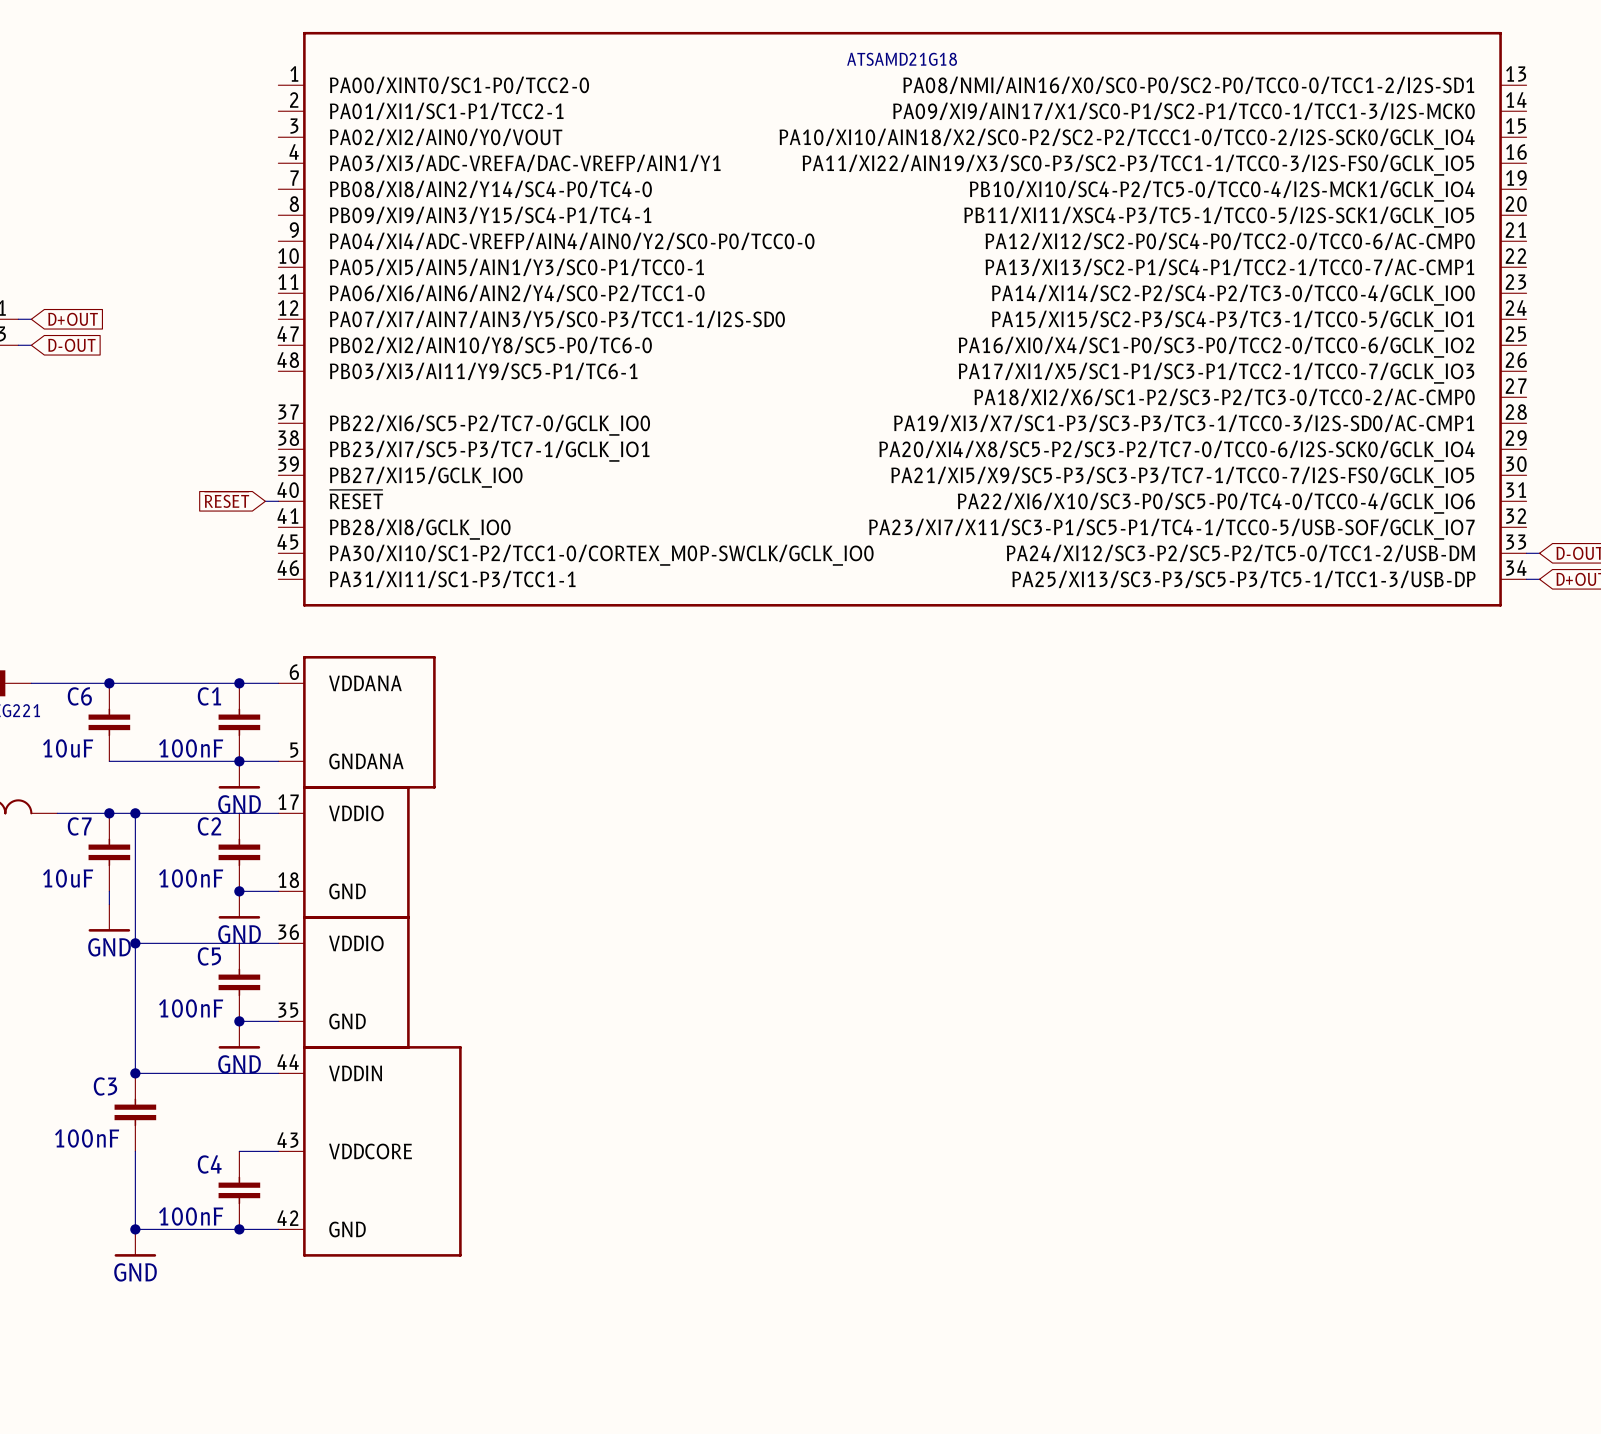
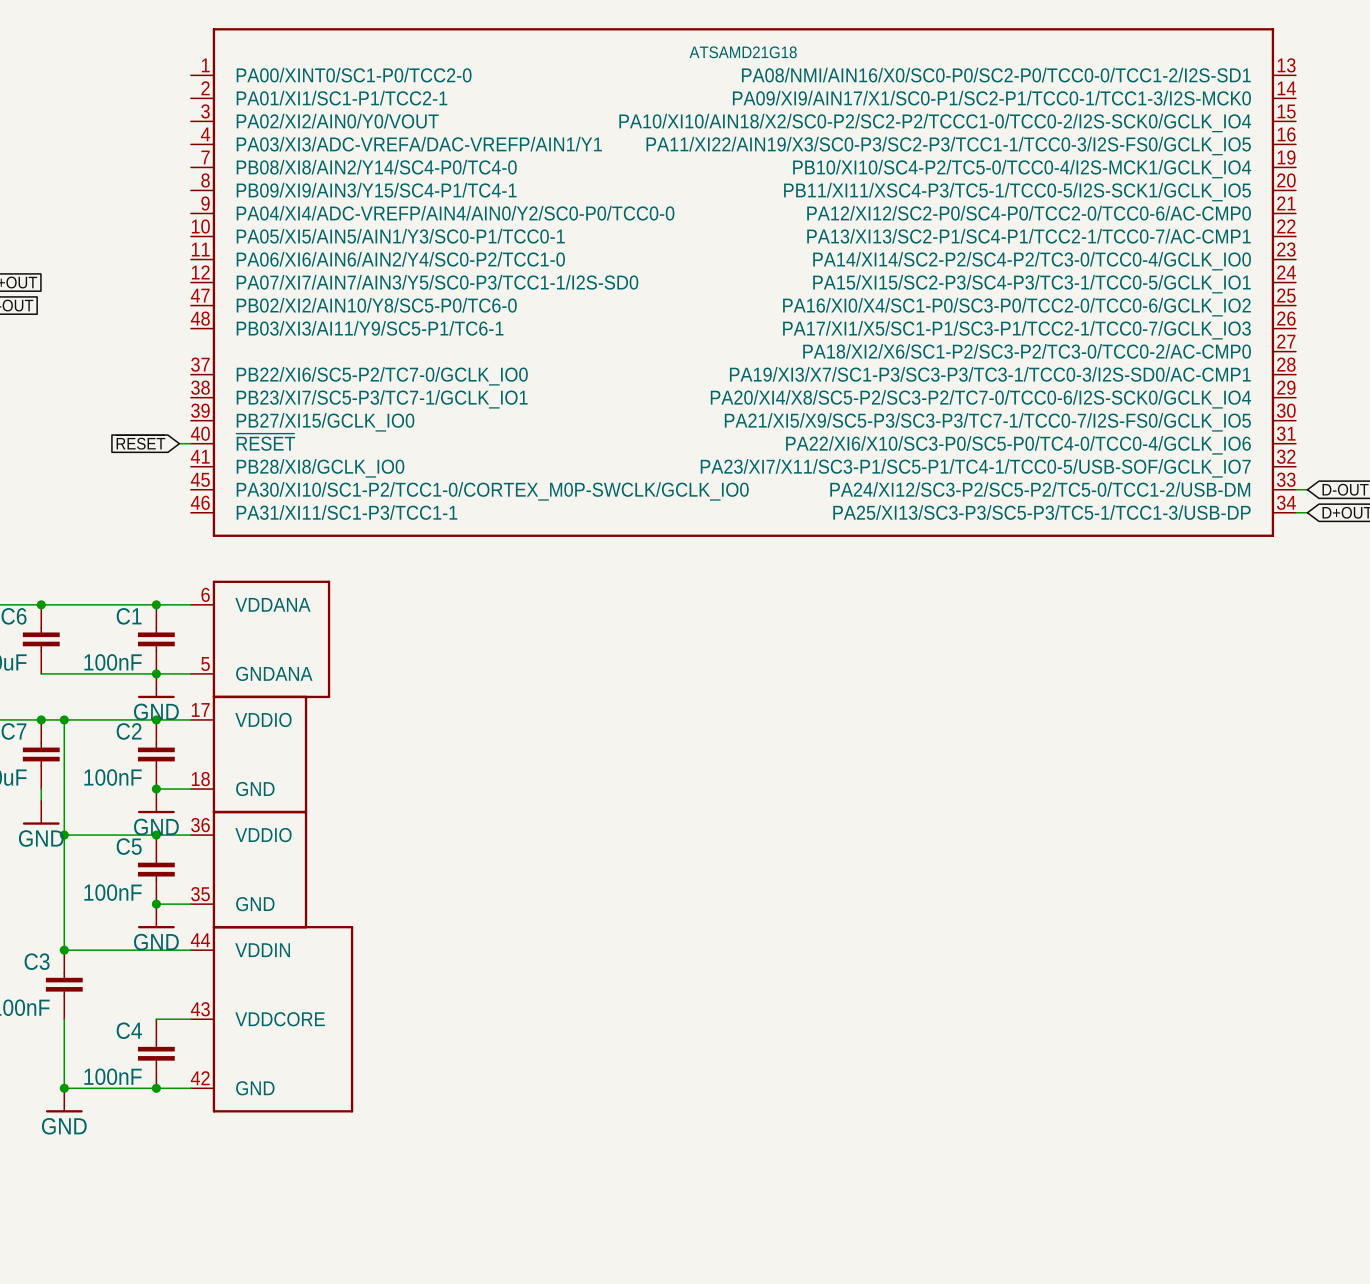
junction: none -> (156, 719)
junction: none -> (156, 835)

